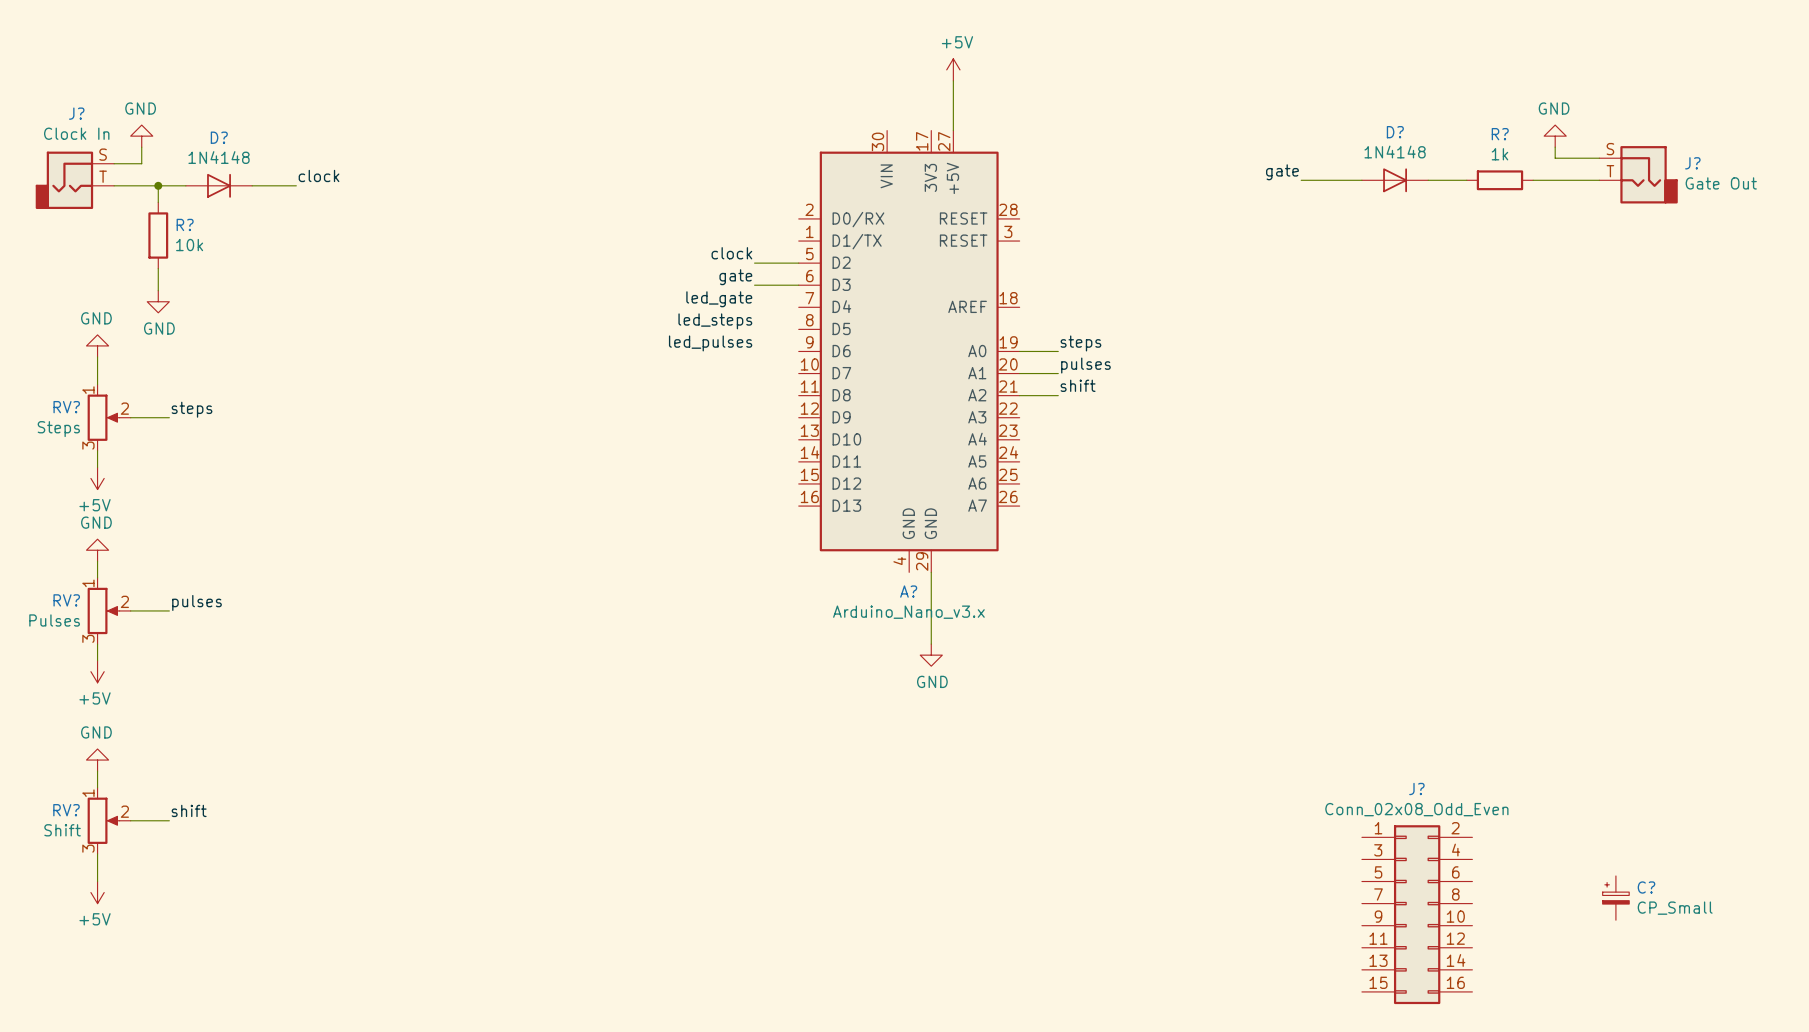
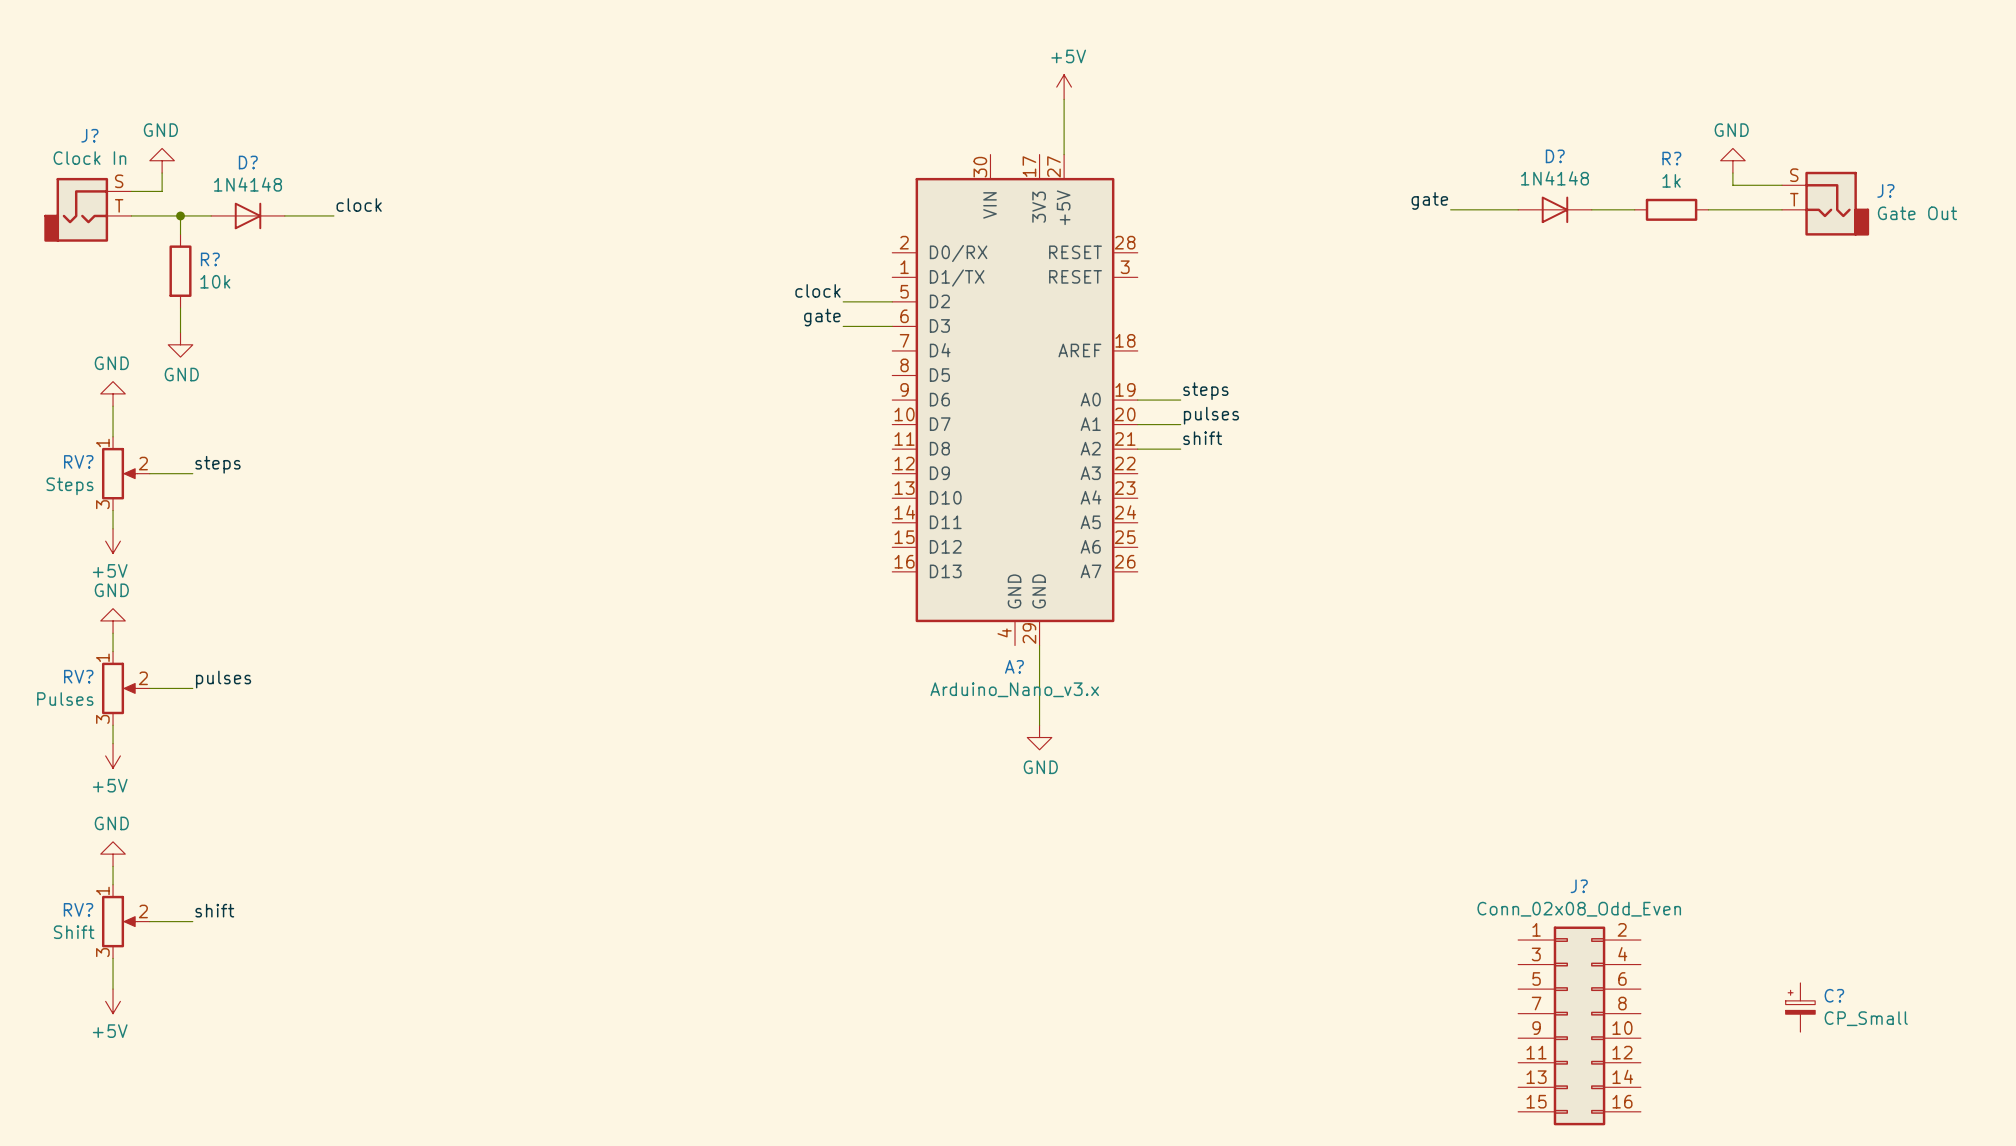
label: led_gate (719, 299) -> none
label: led_steps (715, 321) -> none
label: led_pulses (710, 343) -> none

